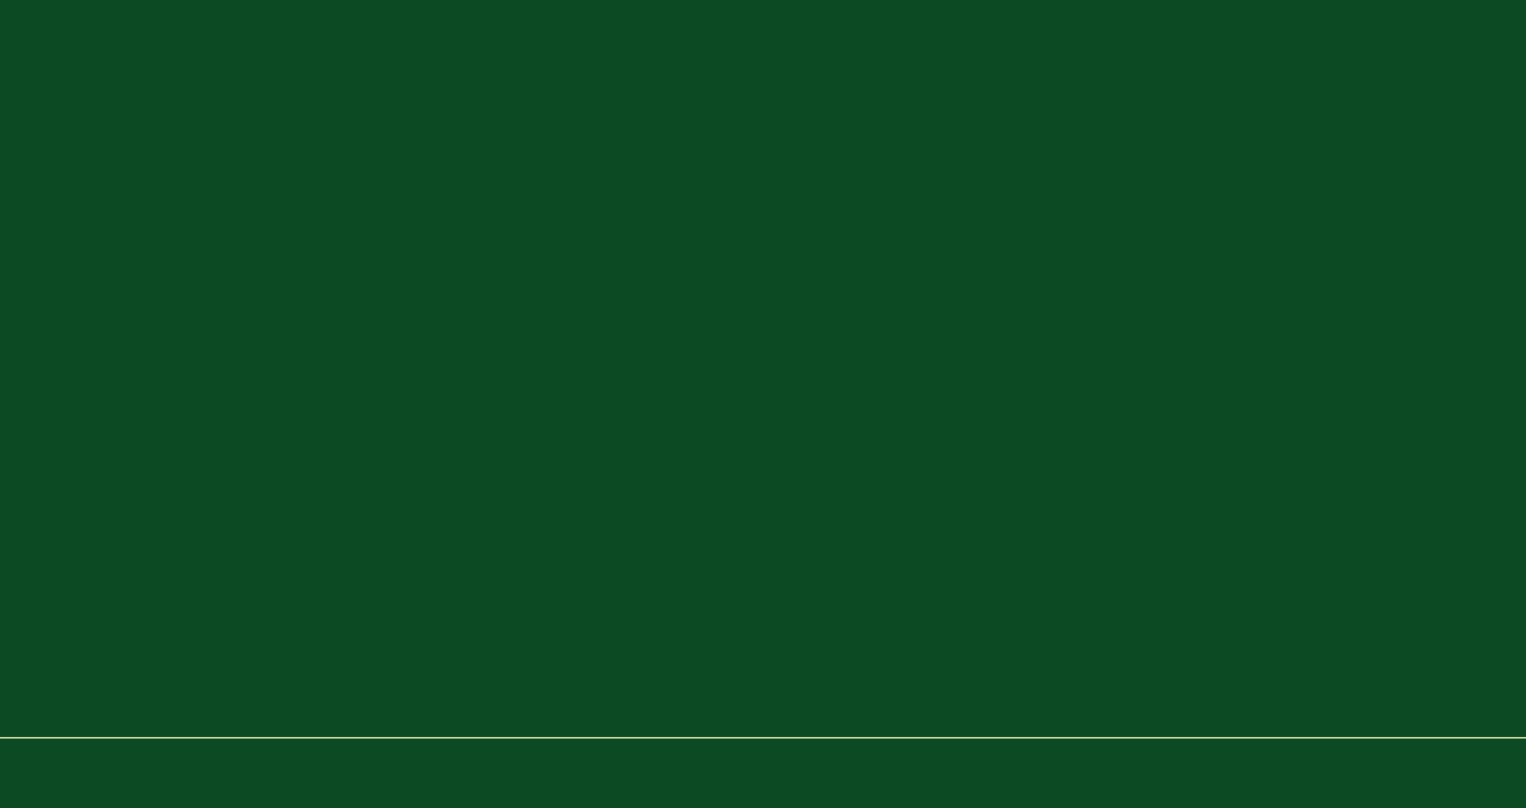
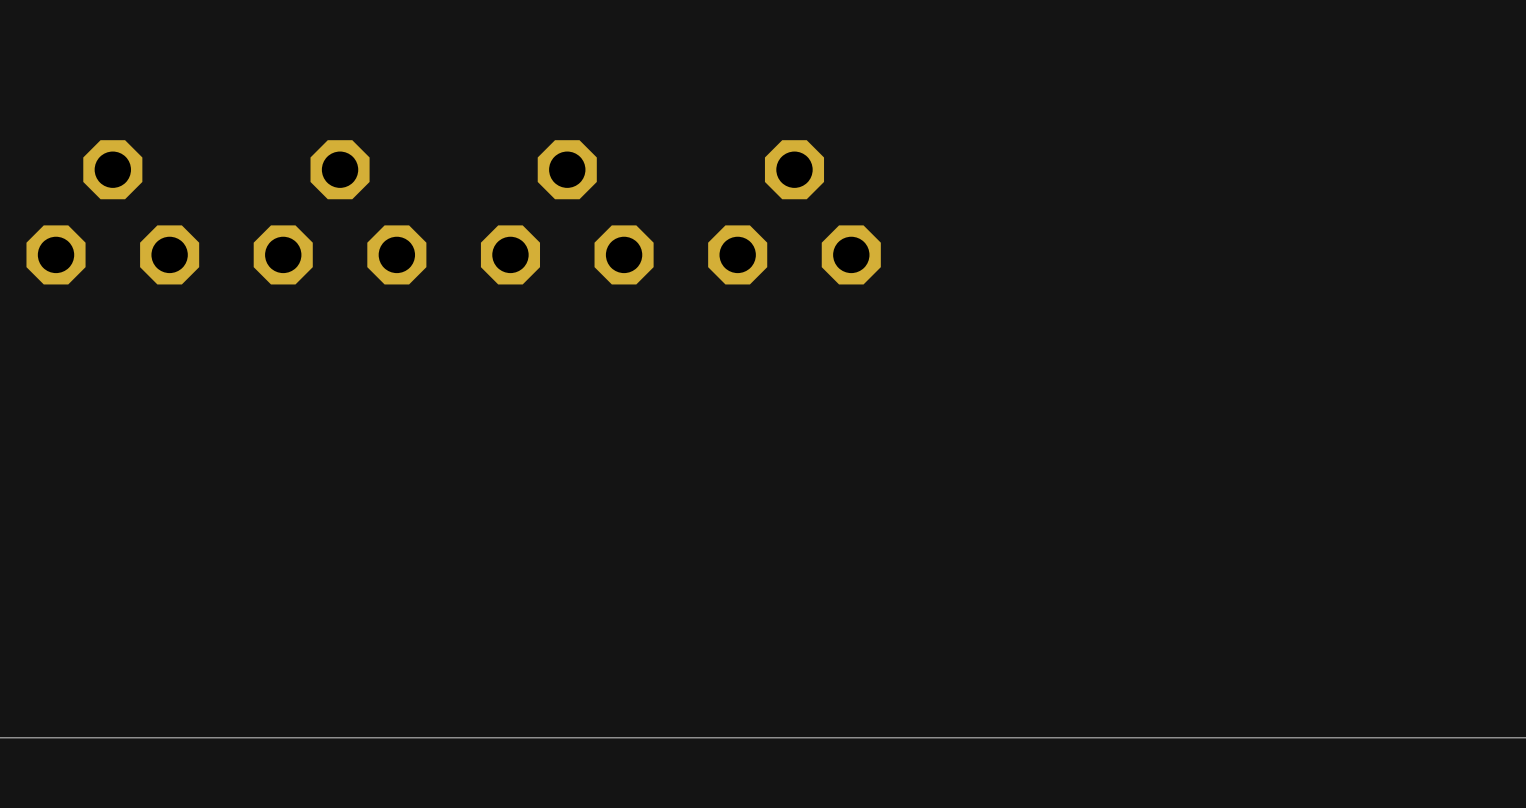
part: none -> (112, 212)
part: none -> (340, 212)
part: none -> (567, 212)
part: none -> (794, 212)

